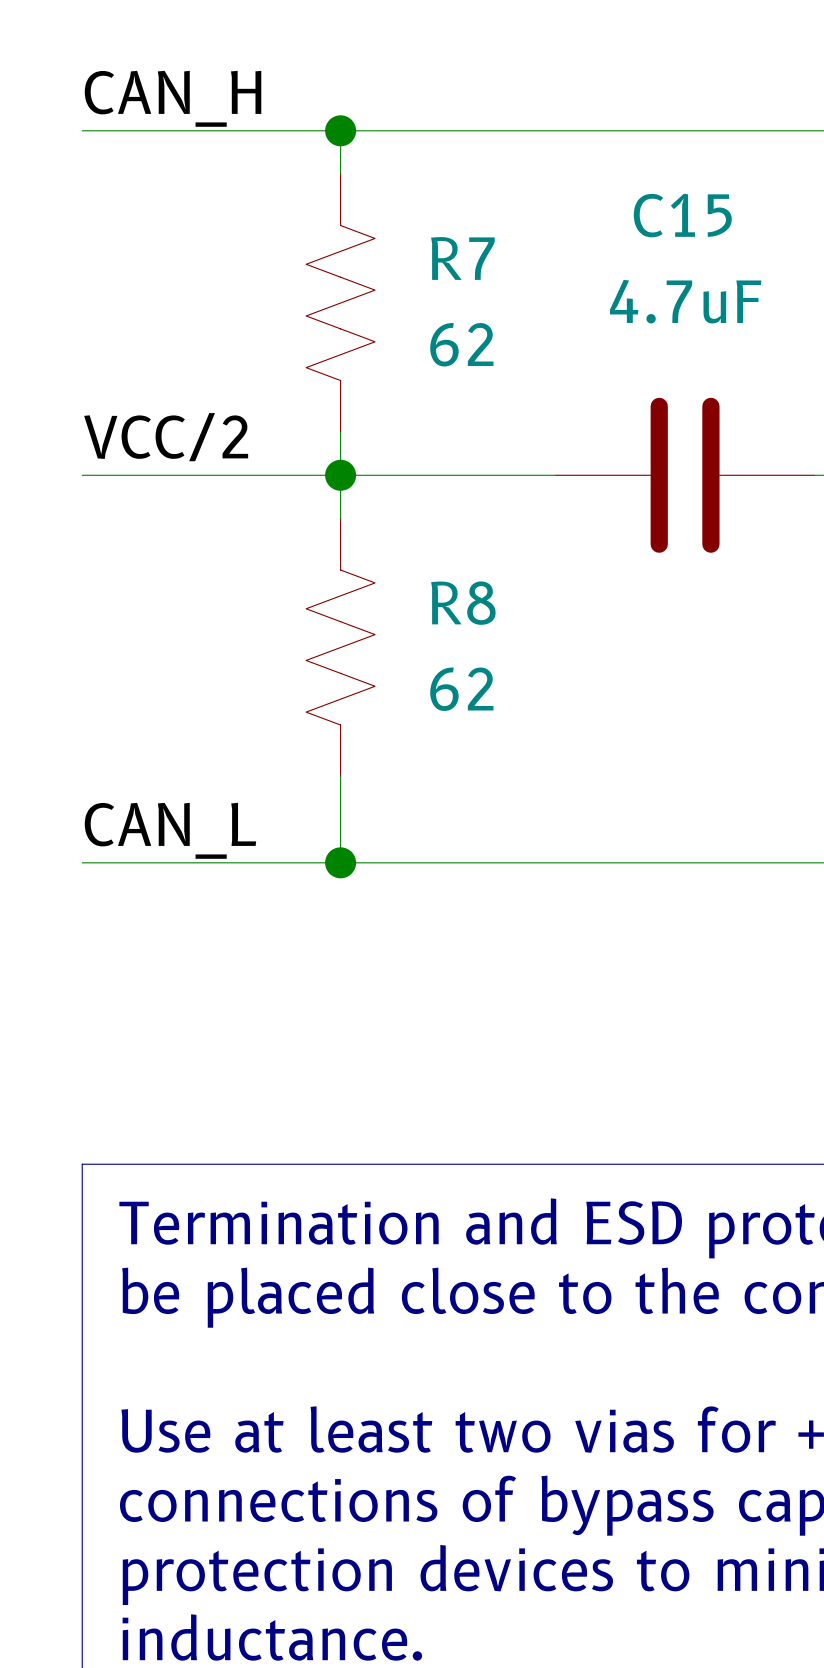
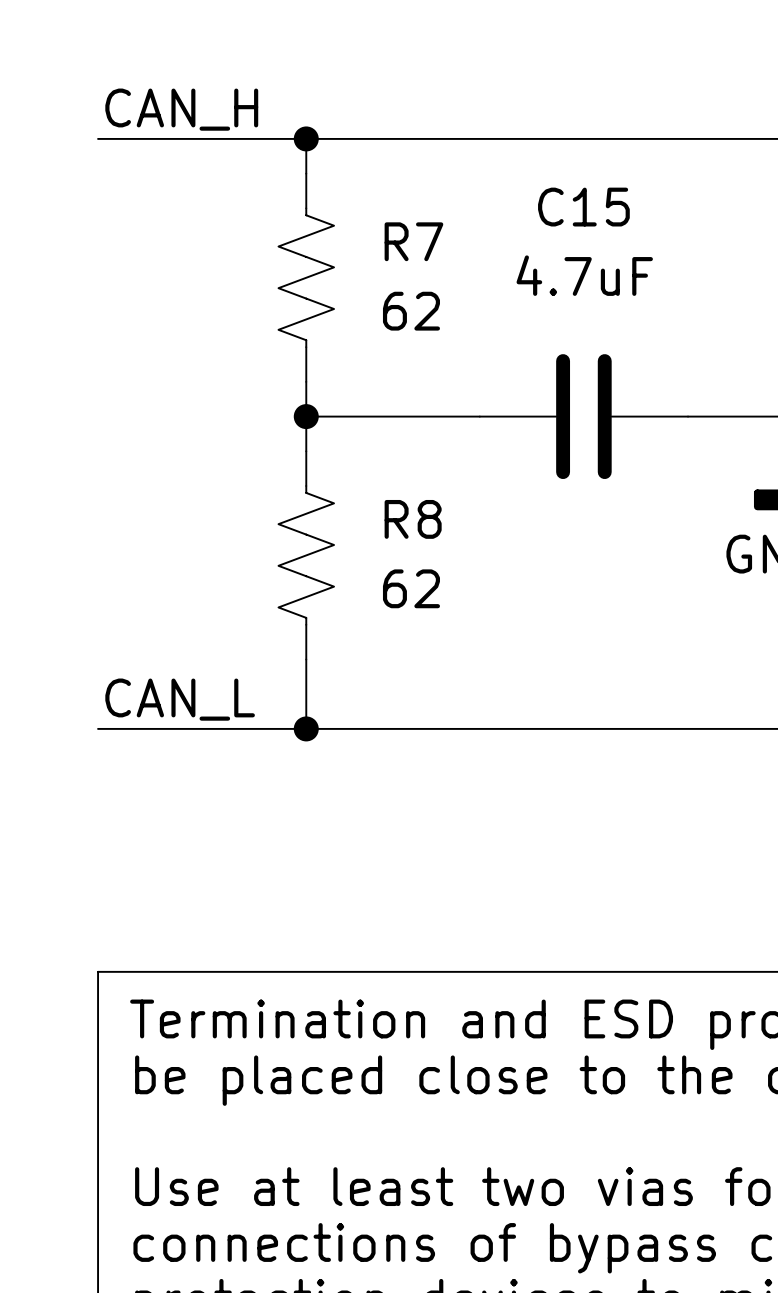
label: VCC/2 (166, 437) -> none
wire: (82, 475) (340, 475) -> none

